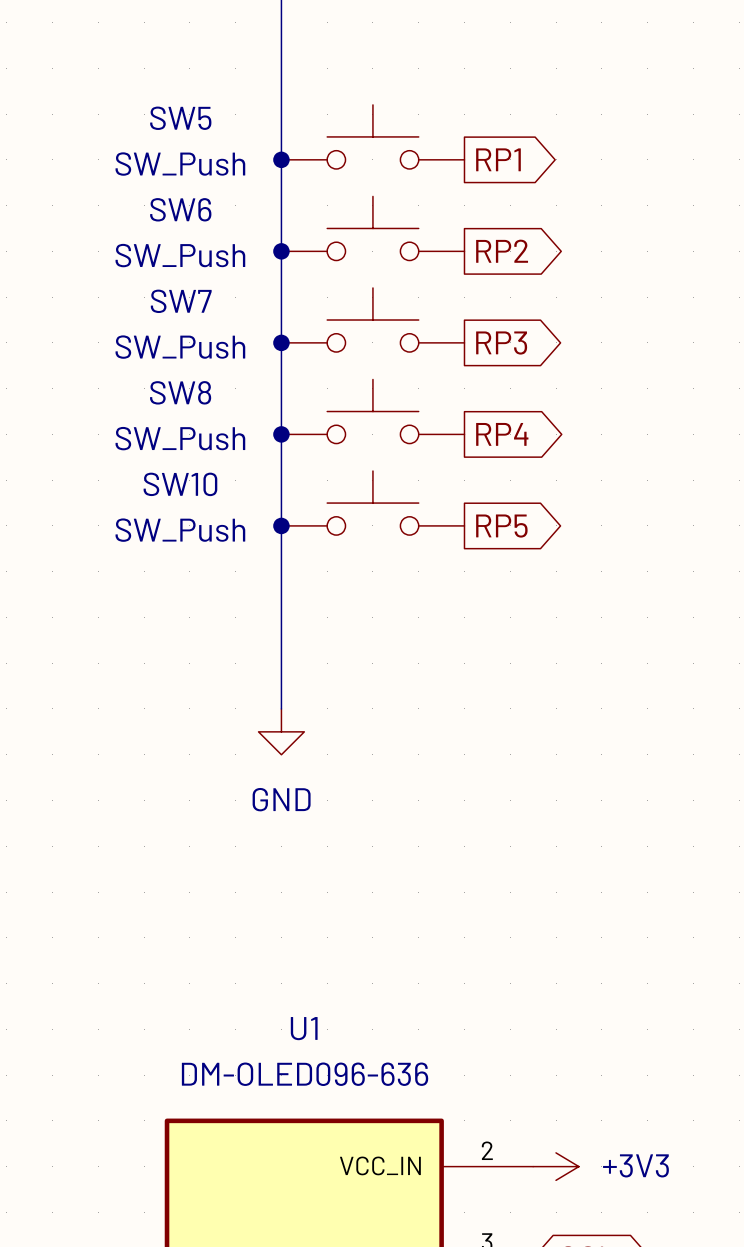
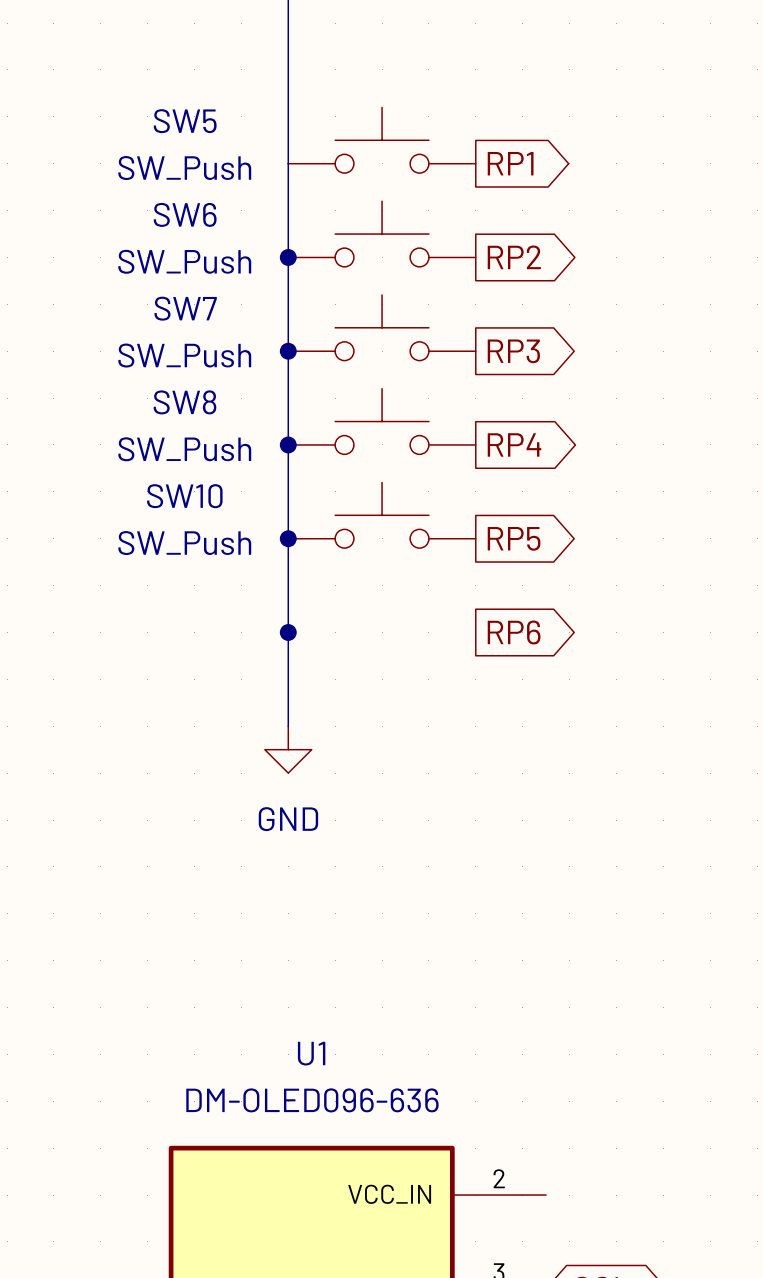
junction: (281, 159) -> none
junction: none -> (288, 632)
global label: none -> RP6 (514, 632)
power symbol: +3V3 (556, 1166) -> none

